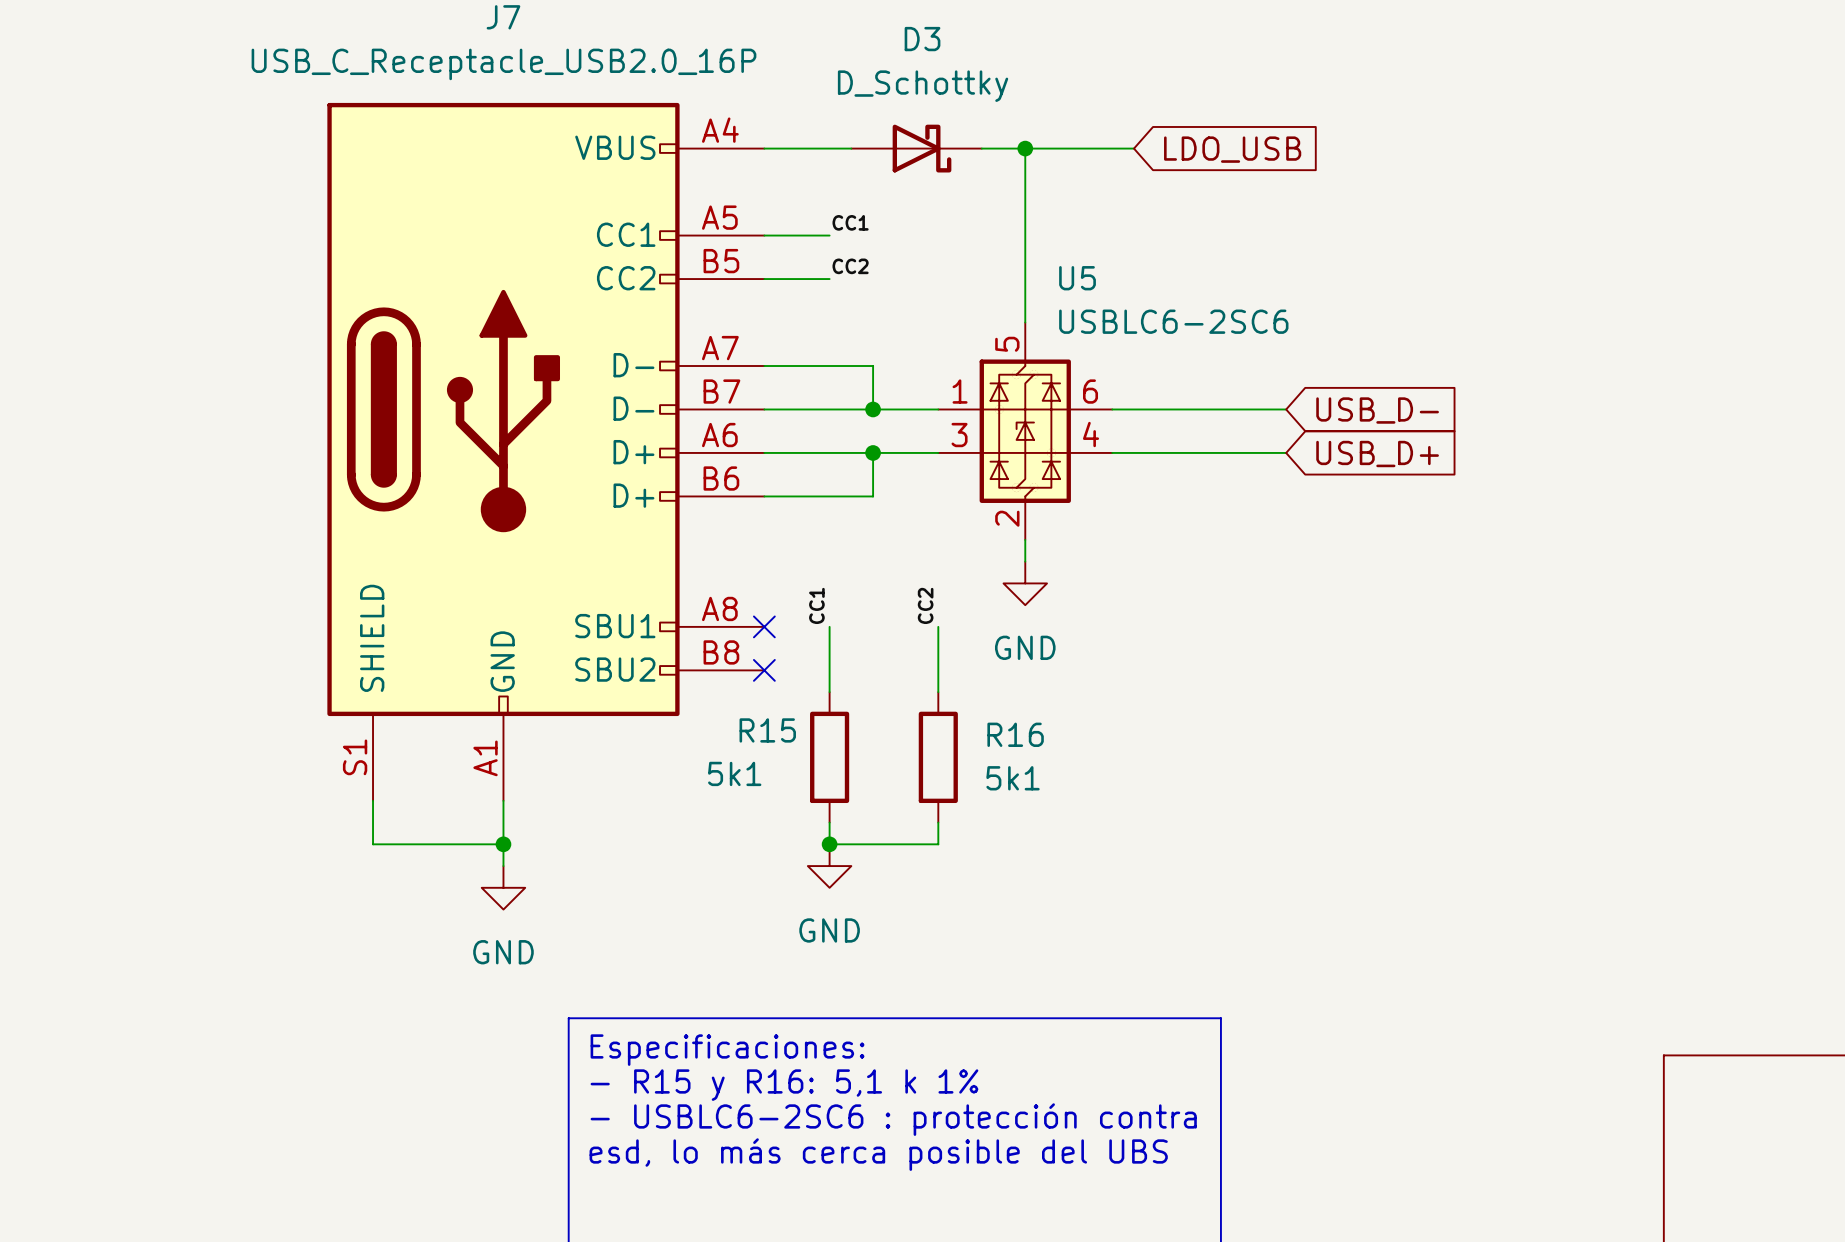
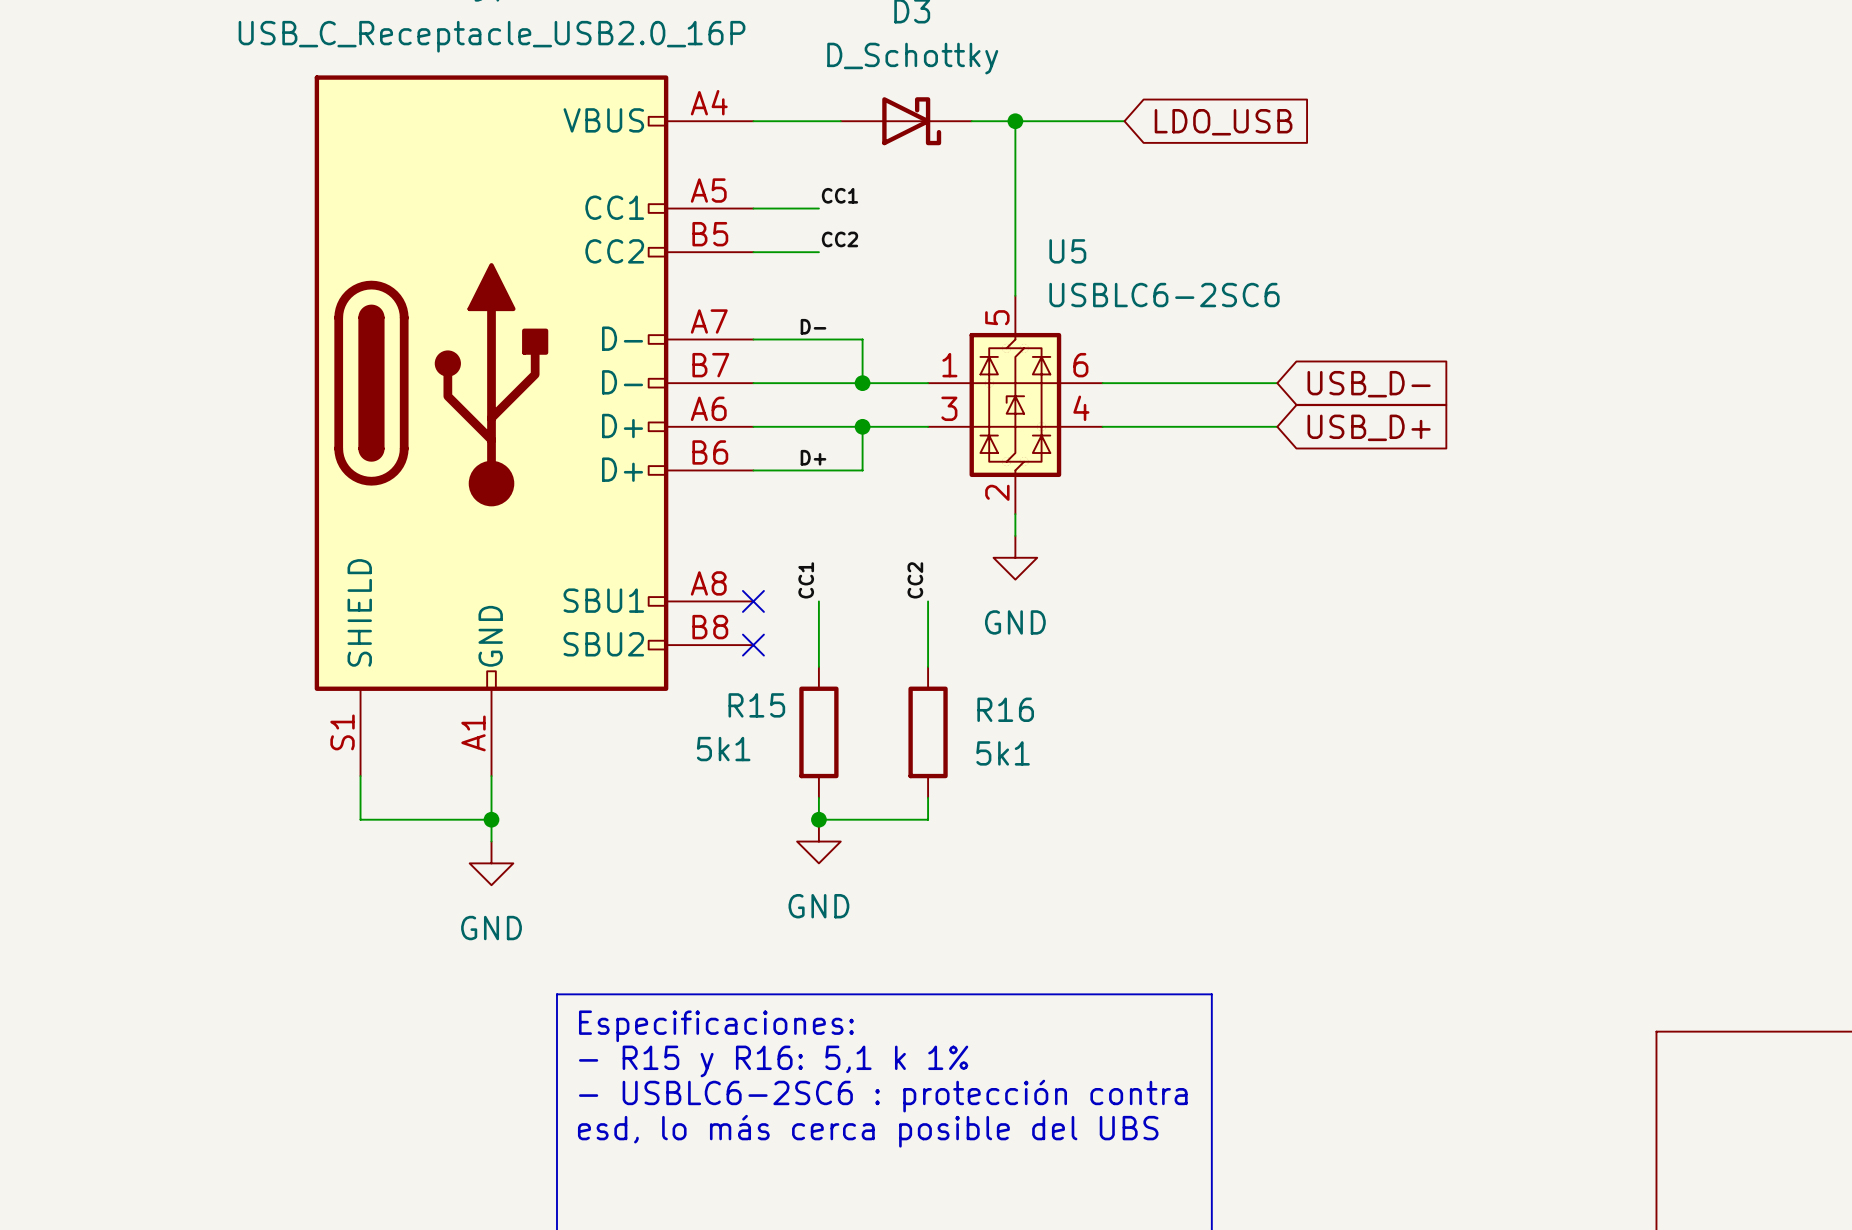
label: none -> D- (813, 326)
label: none -> D+ (813, 457)

